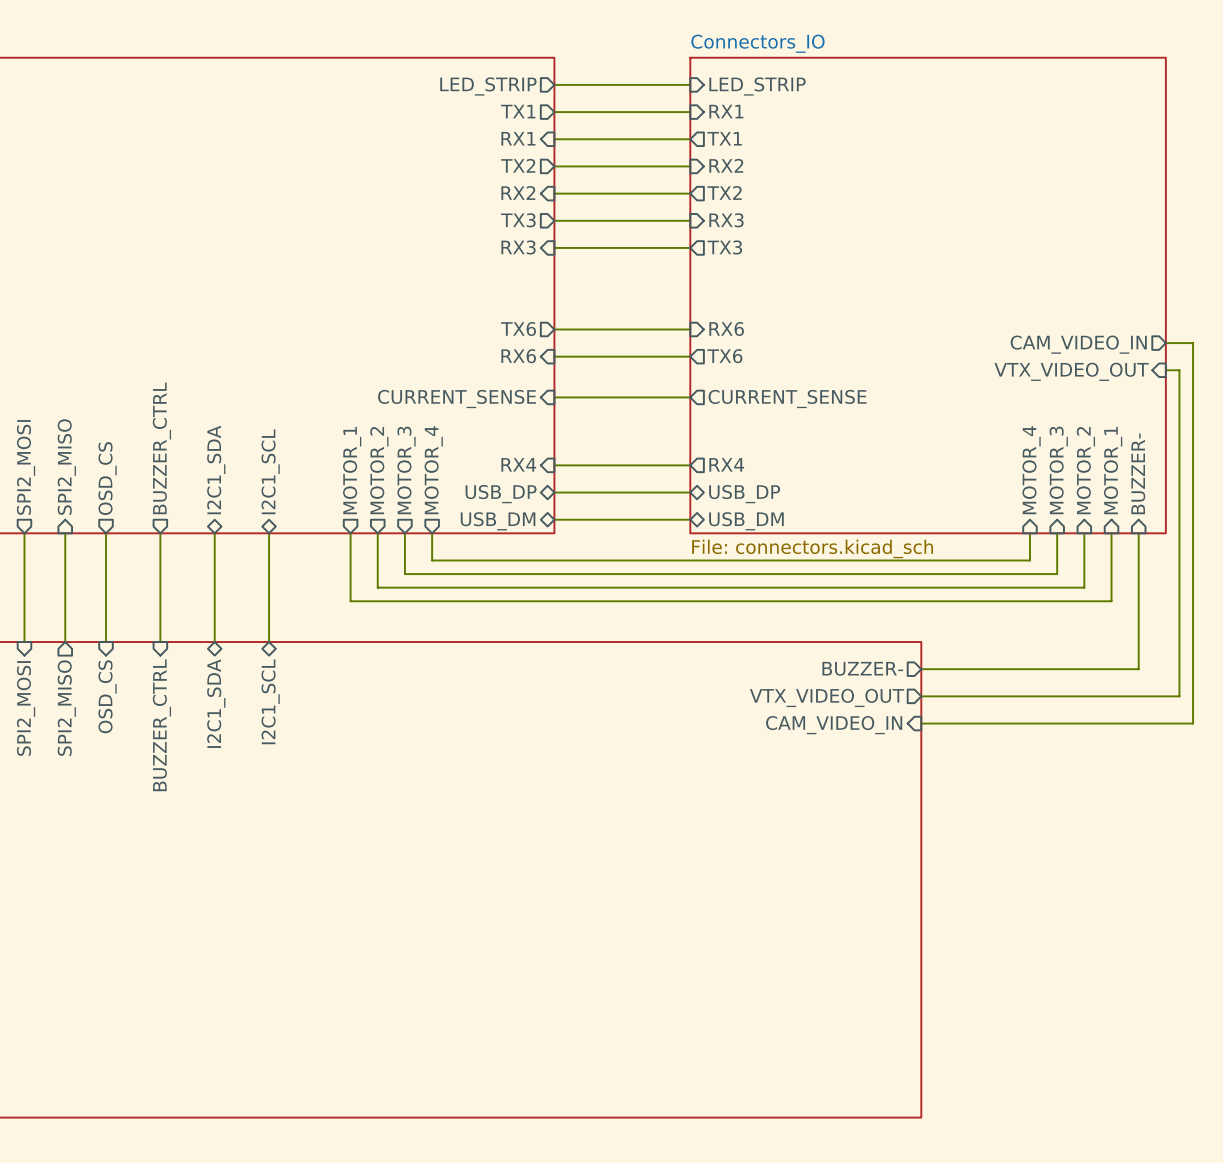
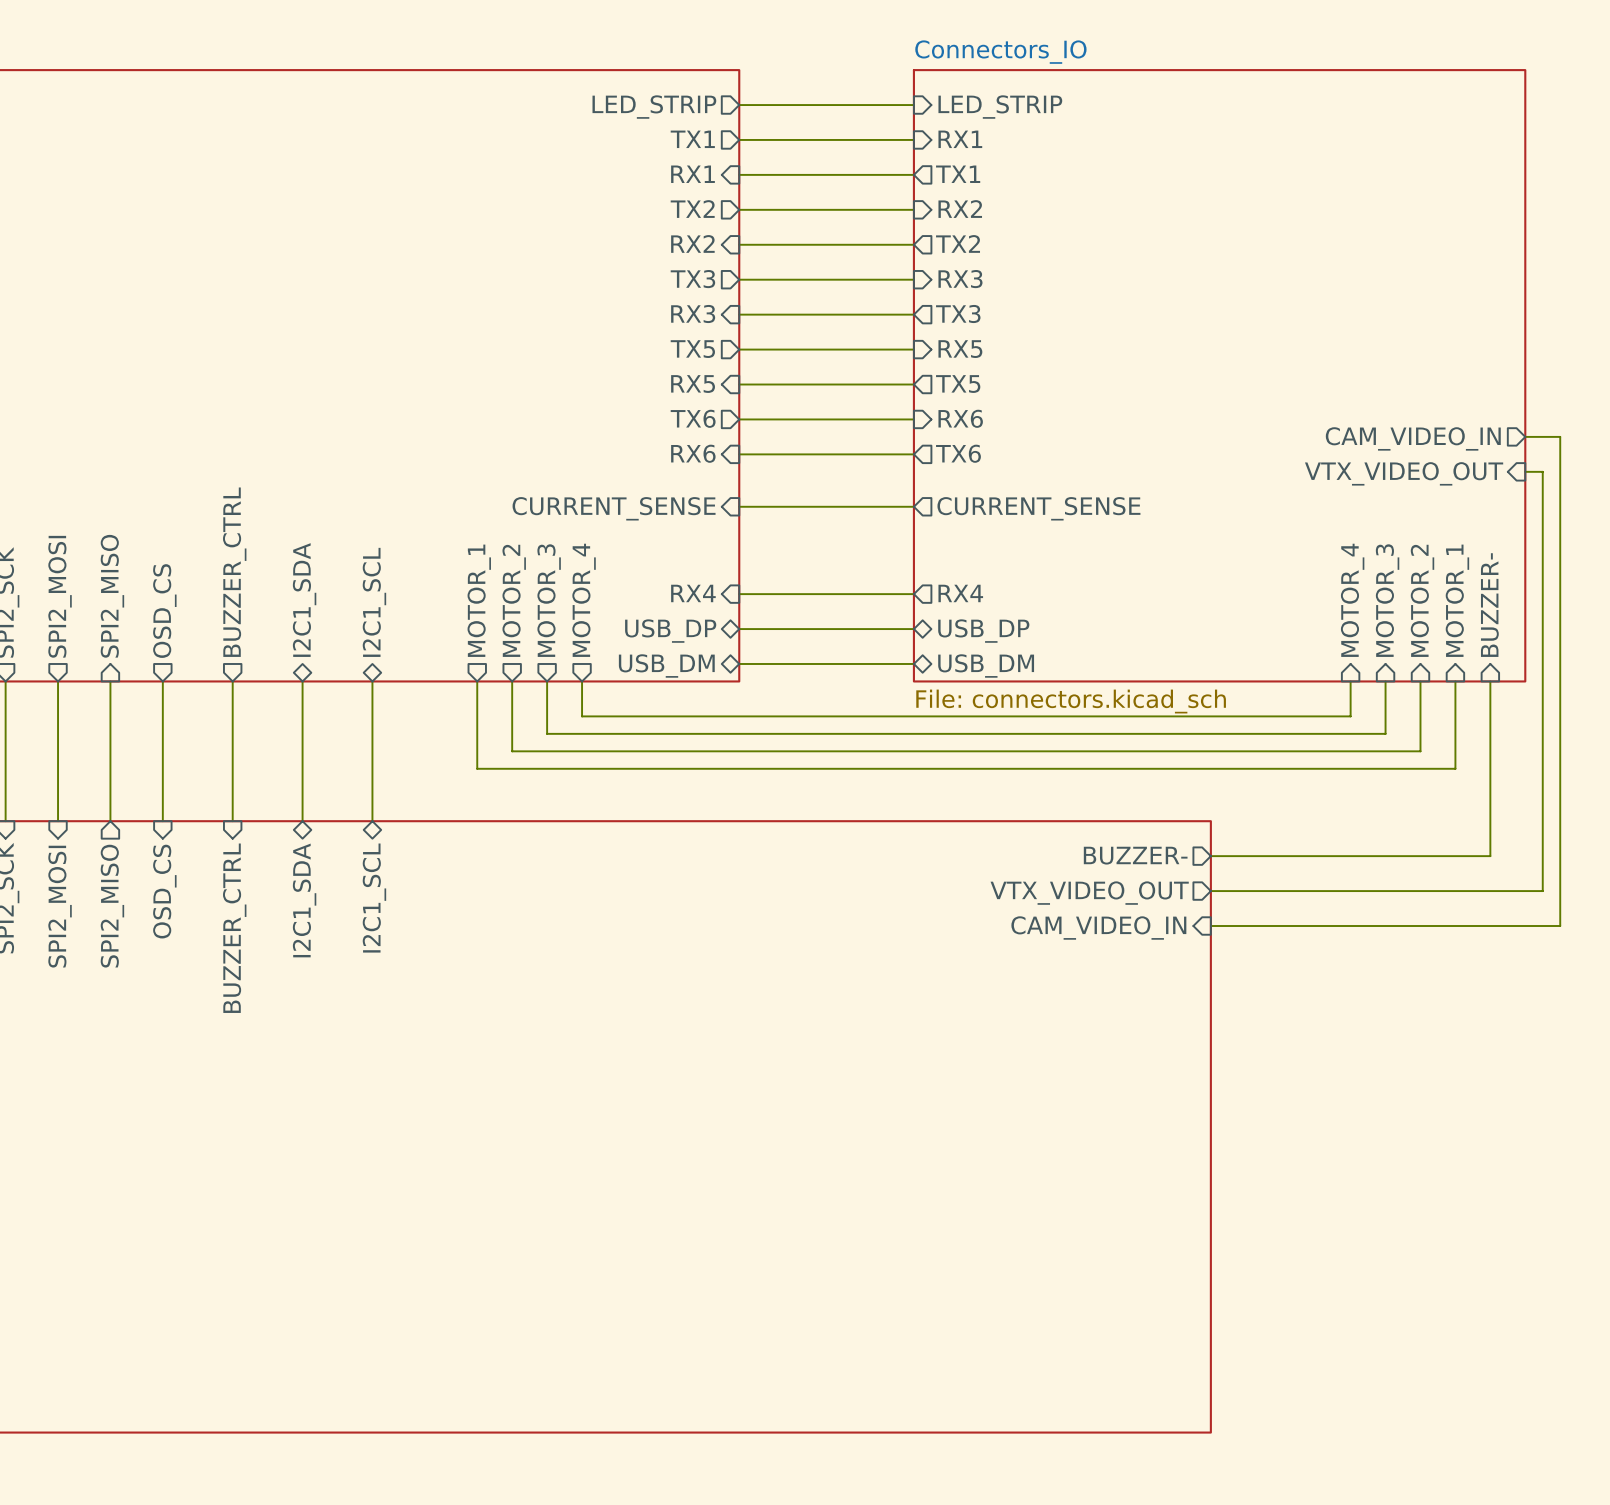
sheet pin: none -> TX5 (692, 349)
sheet pin: none -> RX5 (960, 349)
wire: none -> (739, 349) (913, 349)
sheet pin: none -> RX5 (693, 384)
sheet pin: none -> TX5 (958, 384)
wire: none -> (739, 384) (913, 384)

